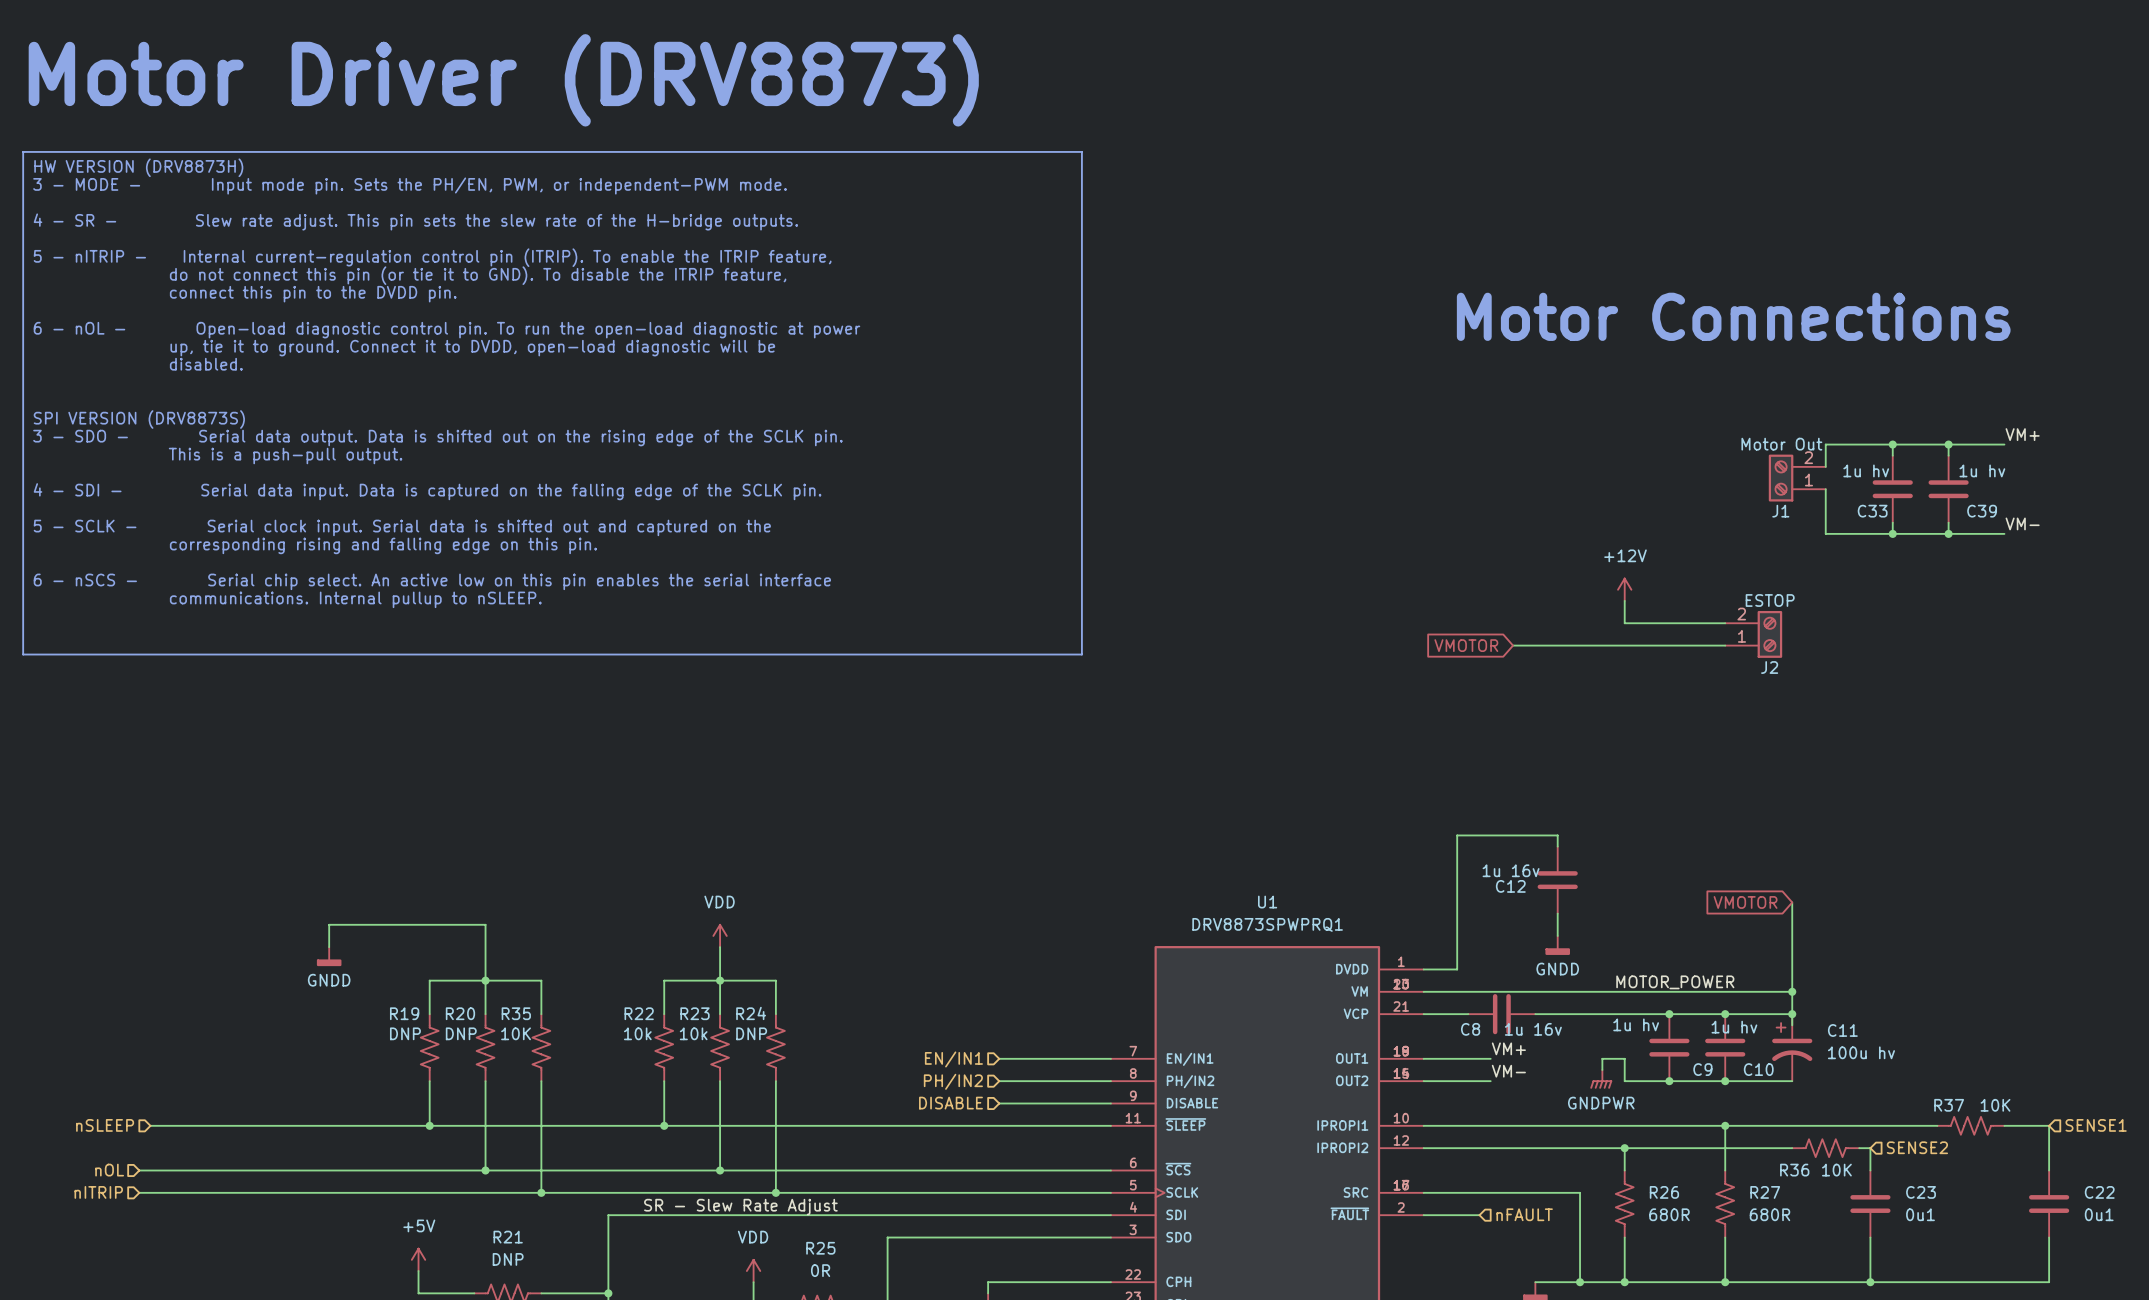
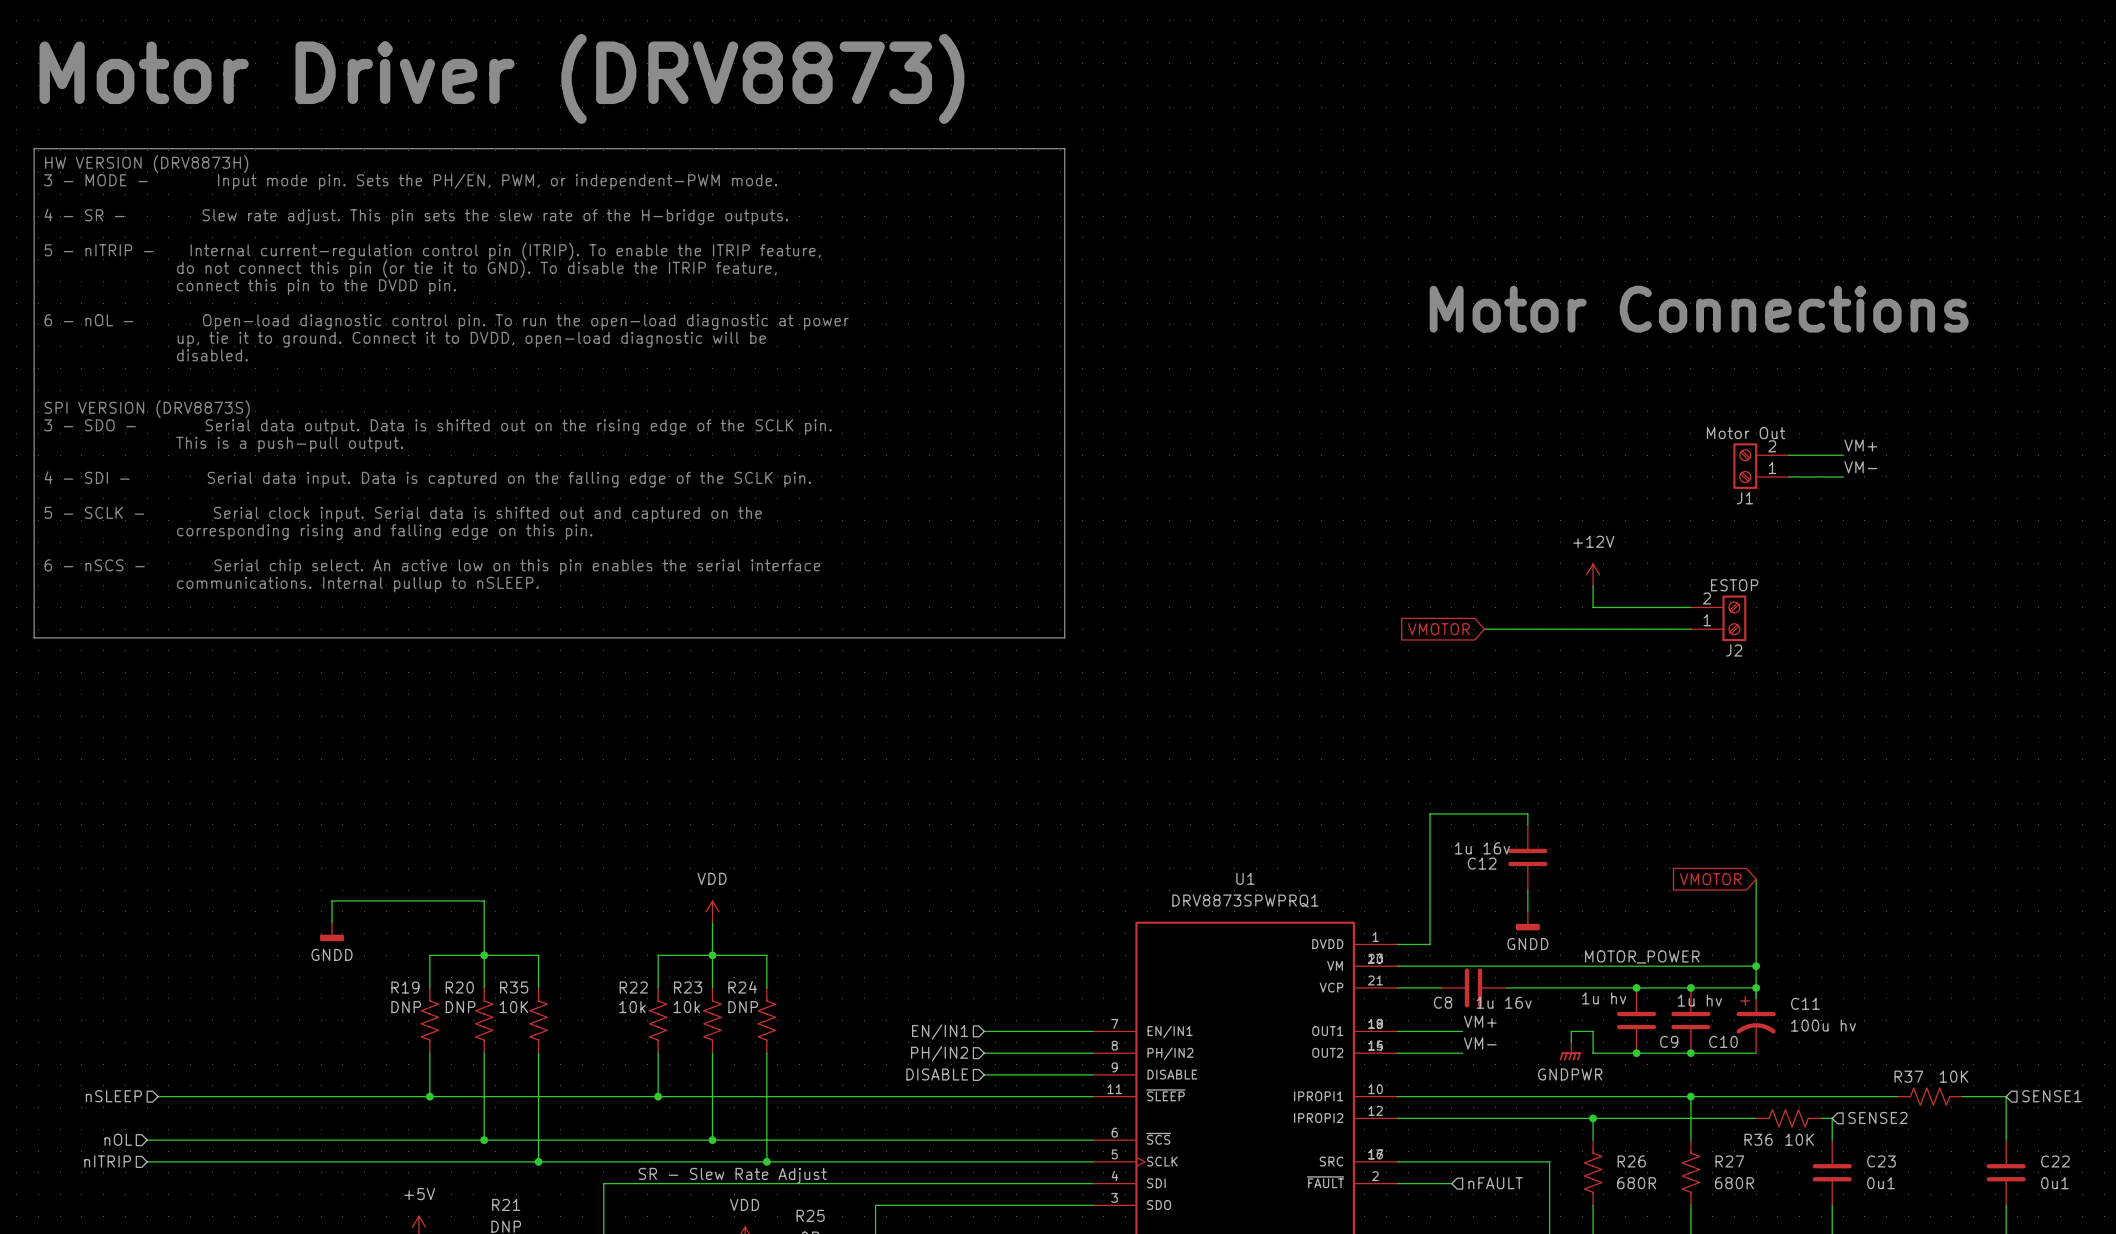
label position: VM+ (2022, 434) -> VM+ (1860, 445)
wire: (1892, 444) (1892, 455) -> none
junction: (1892, 444) -> none
wire: (1948, 444) (1948, 455) -> none
junction: (1948, 444) -> none
wire: (2004, 444) (1825, 444) (1825, 466) -> (1843, 455) (1788, 455)
wire: (1825, 489) (1825, 533) (2004, 533) -> (1788, 476) (1843, 476)
C33: 1u hv (1892, 489) -> none
C39: 1u hv (1948, 489) -> none
wire: (1892, 522) (1892, 533) -> none
wire: (1948, 522) (1948, 533) -> none
label position: VM- (2022, 523) -> VM- (1860, 467)
junction: (1892, 533) -> none
junction: (1948, 533) -> none

